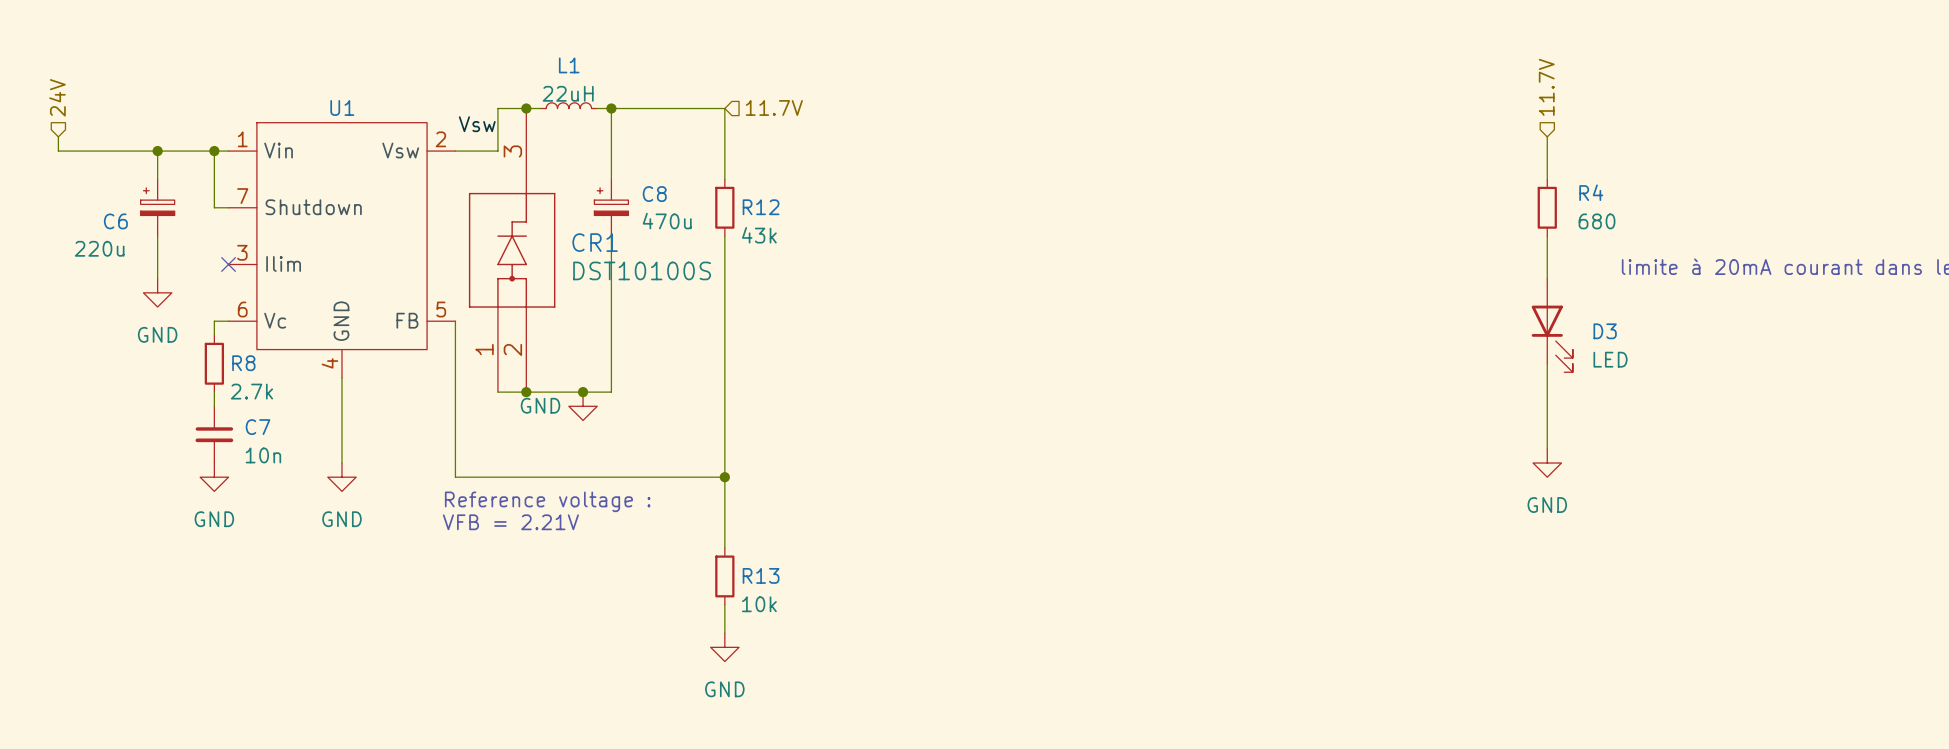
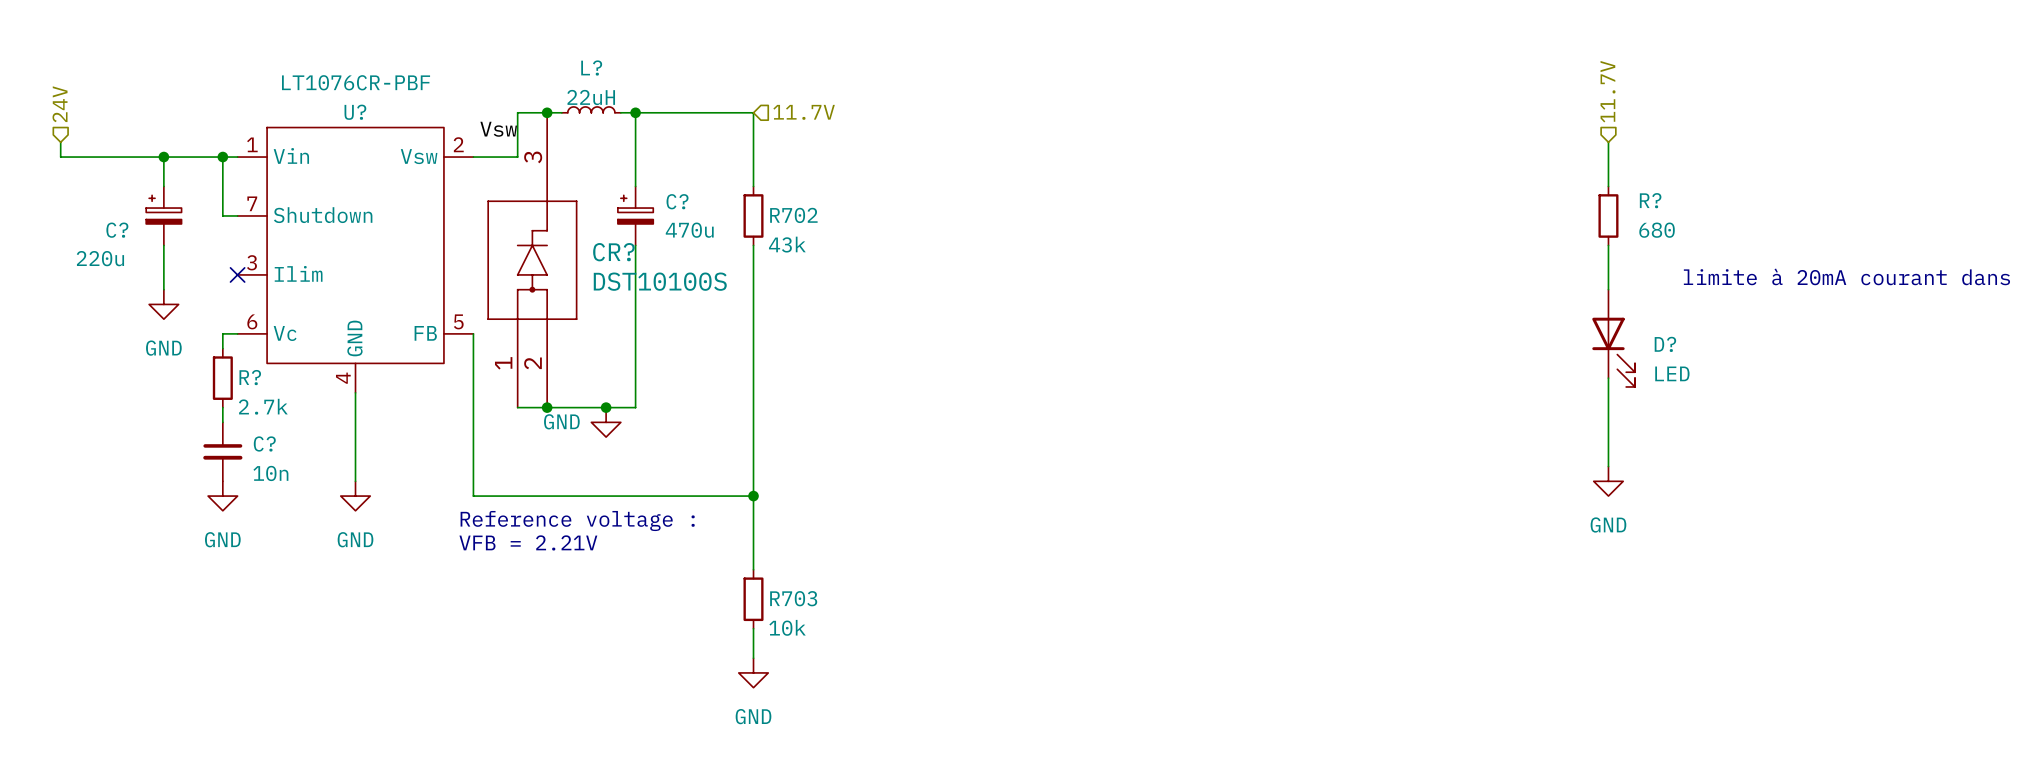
L1 name: L1 (569, 65) -> L? (591, 68)
U1 value: none -> LT1076CR-PBF (356, 82)
U1 name: U1 (342, 107) -> U? (355, 112)
R4 name: R4 (1591, 192) -> R? (1650, 200)
C8 name: C8 (654, 194) -> C? (677, 201)
R12 name: R12 (761, 207) -> R702 (793, 215)
C6 name: C6 (115, 221) -> C? (117, 230)
CR1 name: CR1 (595, 242) -> CR? (613, 252)
D3 name: D3 (1605, 331) -> D? (1665, 344)
R8 name: R8 (243, 363) -> R? (250, 377)
C7 name: C7 (258, 427) -> C? (264, 443)
R13 name: R13 (761, 575) -> R703 (793, 598)

